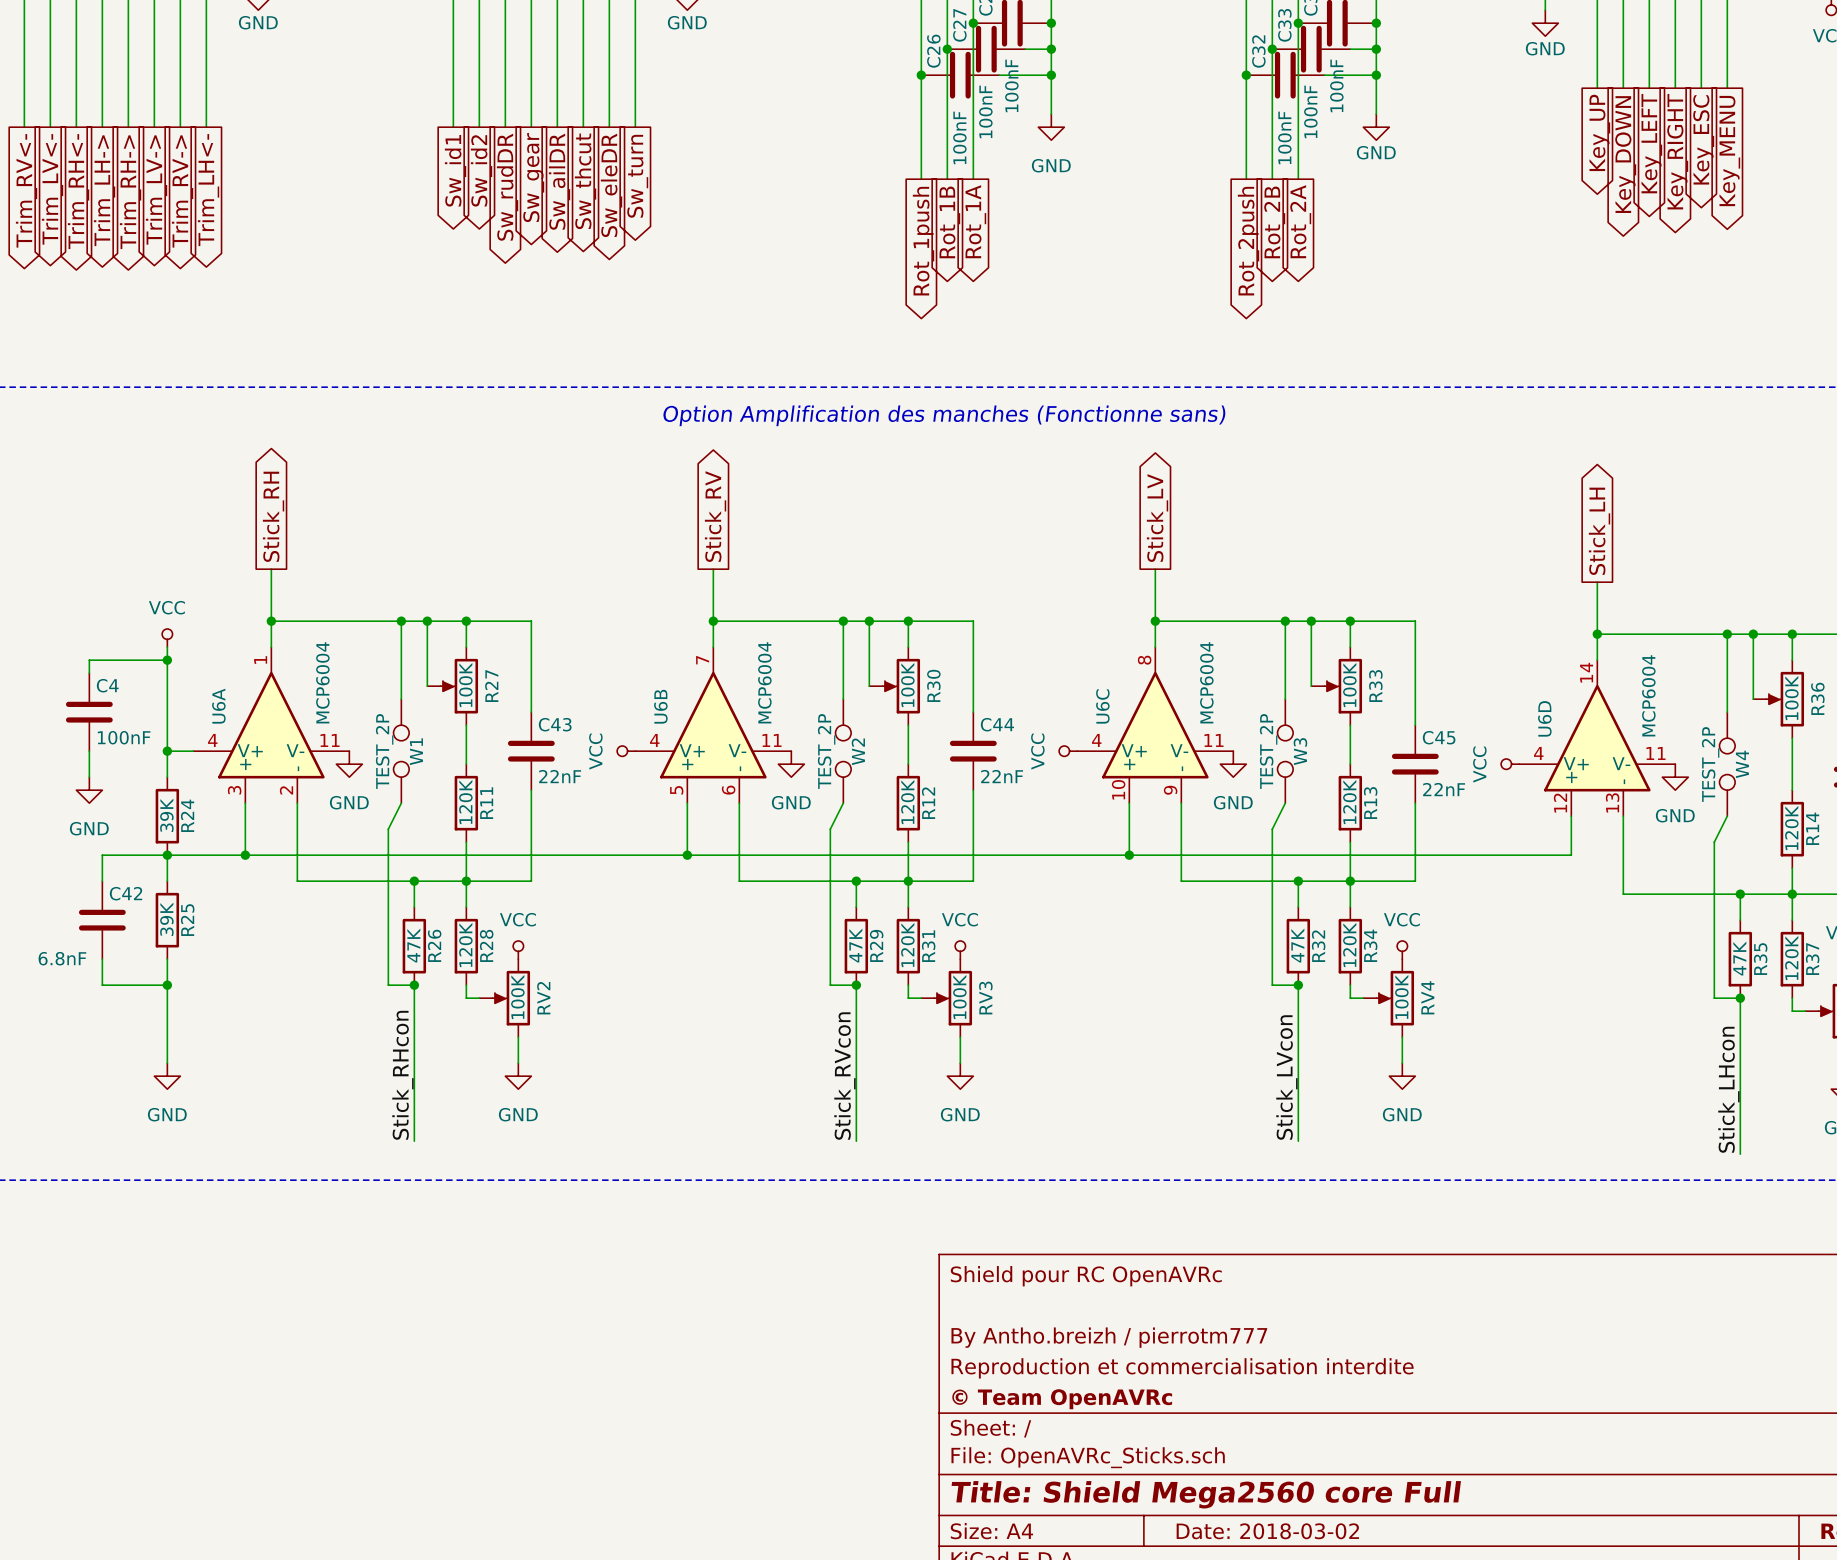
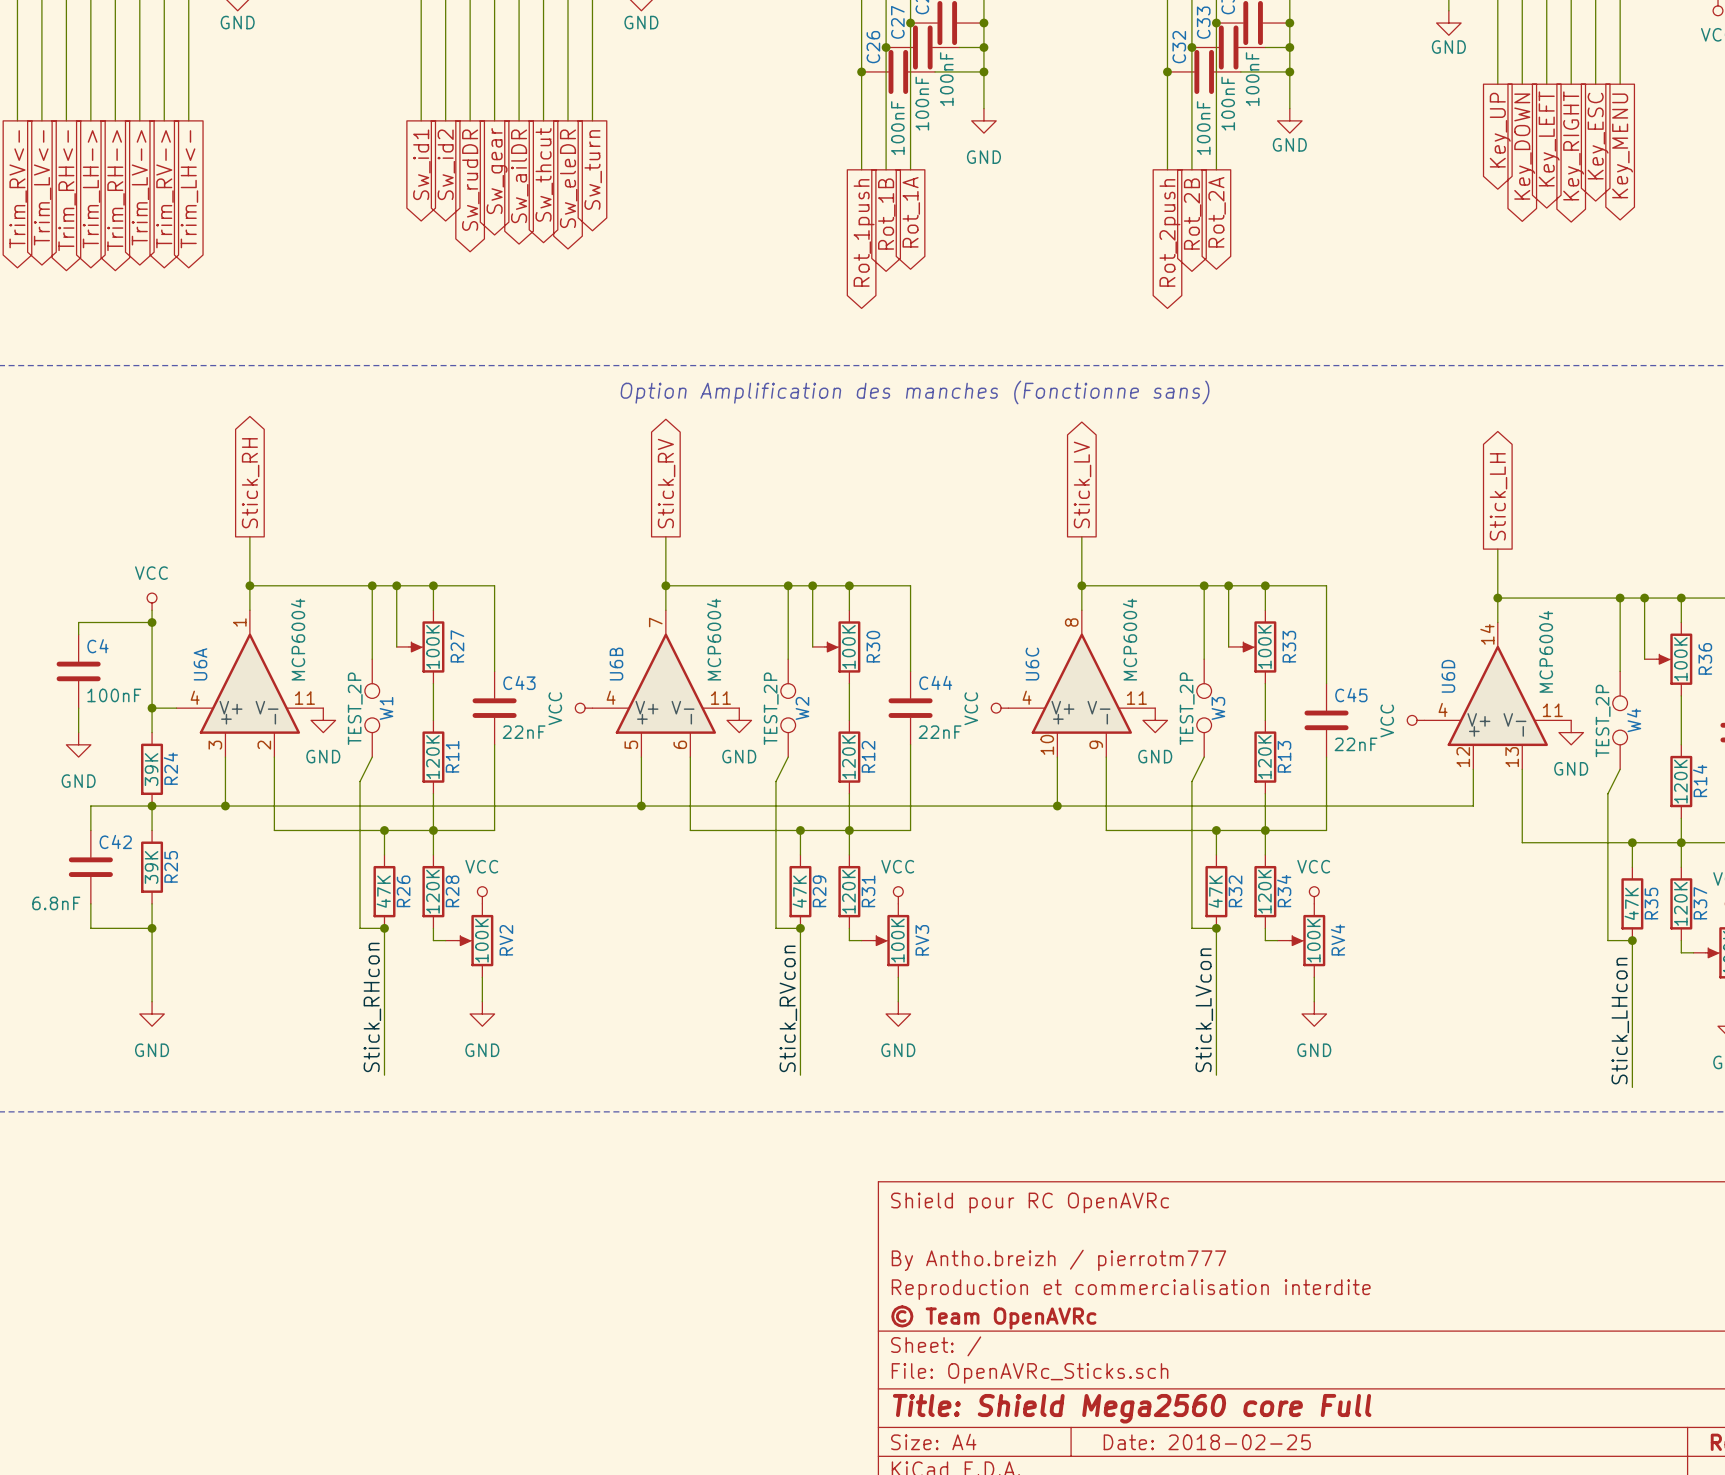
title block: Date: 2018-03-02 (1267, 1531) -> Date: 2018-02-25 (1207, 1442)

